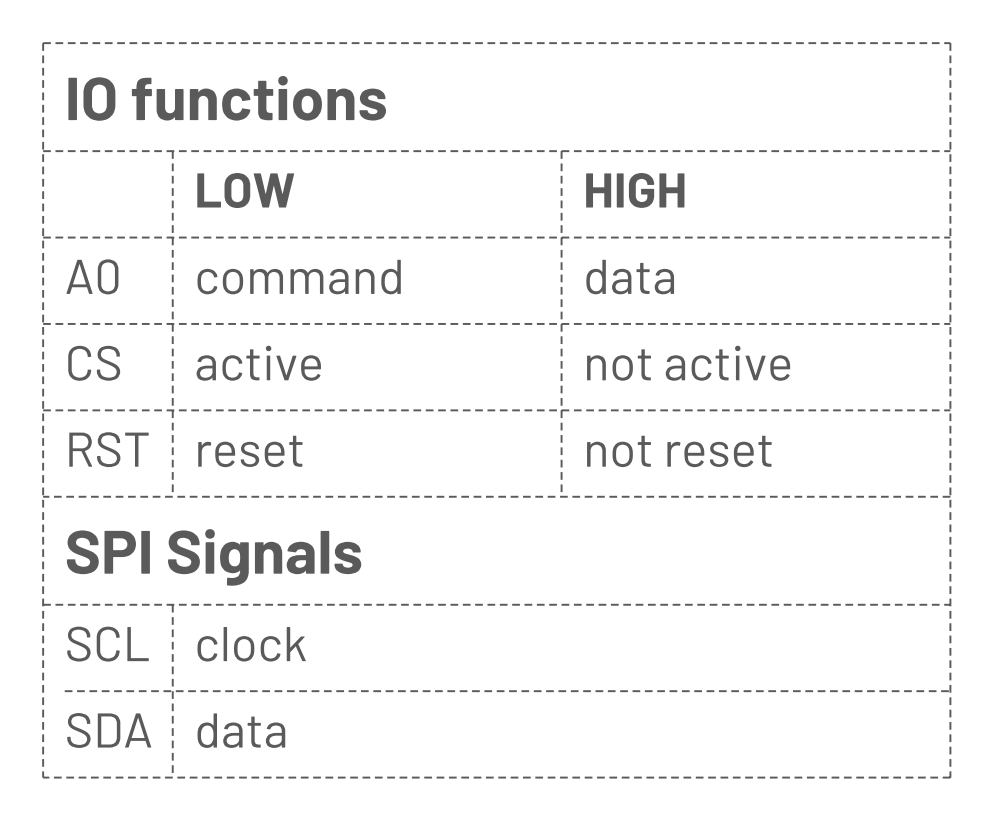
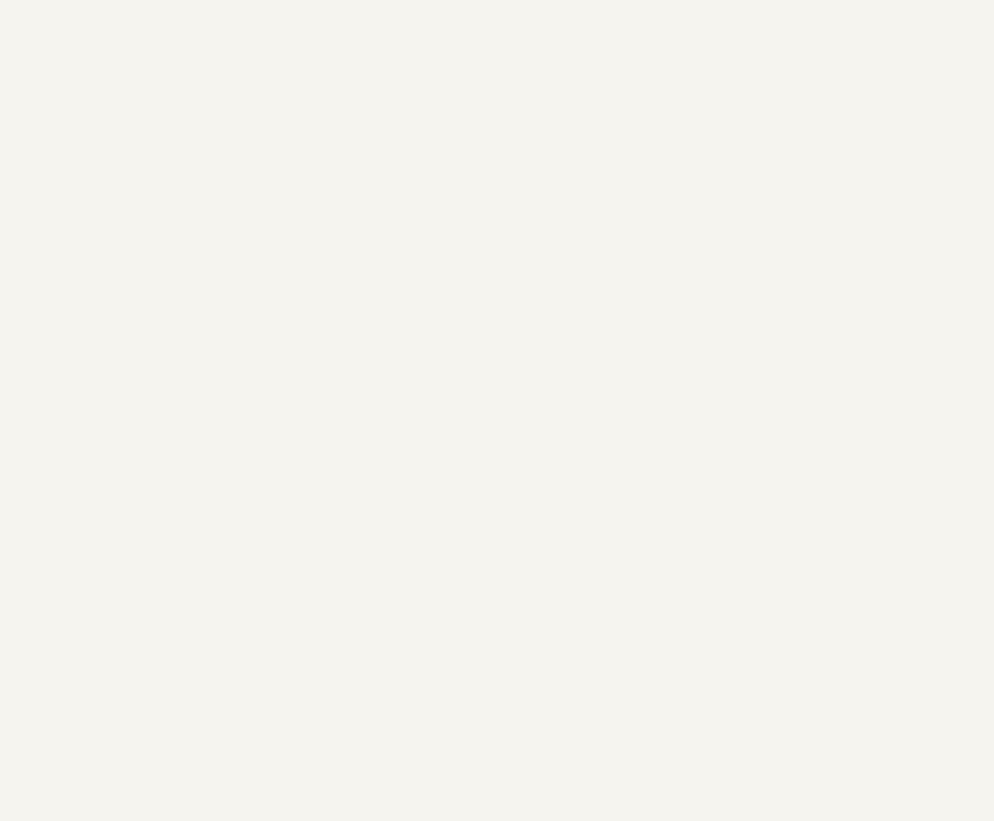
line: (43, 43) (43, 777) (950, 777) (950, 43) (43, 43) -> none
text: IO functions (227, 98) -> none
line: (43, 151) (950, 151) -> none
line: (172, 151) (172, 496) -> none
line: (561, 151) (561, 496) -> none
text: LOW (245, 190) -> none
text: HIGH (635, 190) -> none
line: (43, 237) (950, 237) -> none
text: A0 (92, 276) -> none
text: command (299, 277) -> none
text: data (630, 277) -> none
line: (43, 323) (950, 323) -> none
text: CS (94, 363) -> none
text: active (258, 363) -> none
text: not active (688, 363) -> none
line: (43, 410) (950, 410) -> none
text: RST (109, 449) -> none
text: reset (250, 451) -> none
text: not reset (679, 451) -> none
line: (43, 496) (950, 496) -> none
text: SPI Signals (214, 557) -> none
line: (43, 604) (950, 604) -> none
line: (172, 604) (172, 777) -> none
text: SCL (108, 644) -> none
text: clock (251, 644) -> none
line: (64, 691) (950, 691) -> none
text: SDA (109, 730) -> none
text: data (241, 730) -> none

